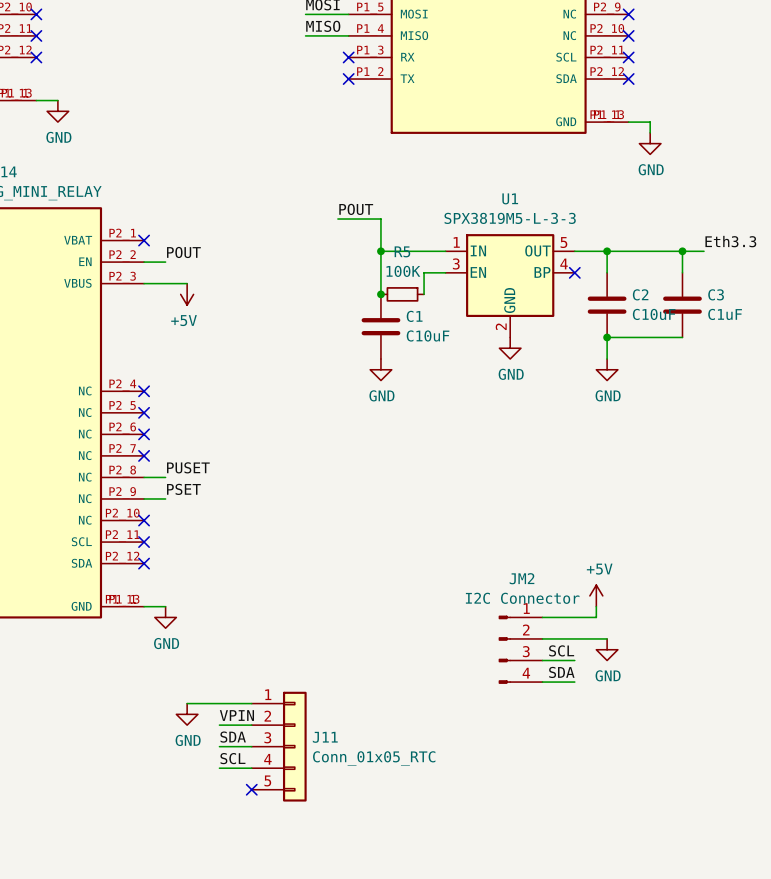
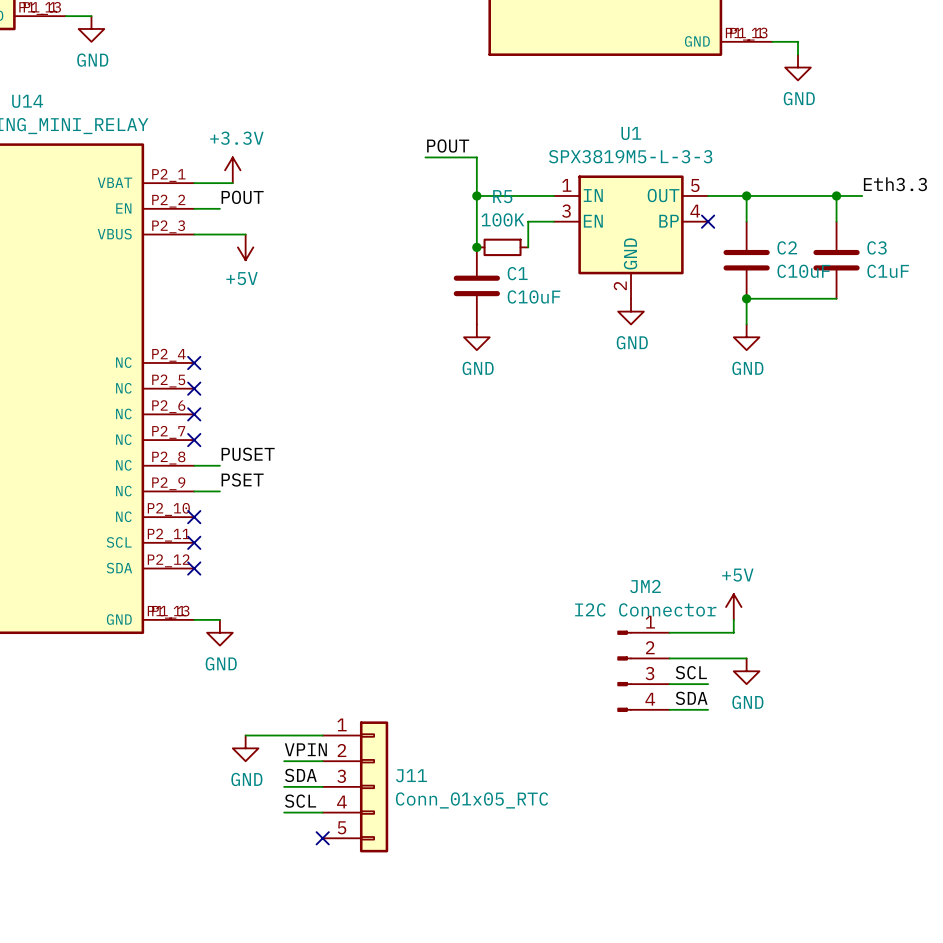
power symbol: none -> +3.3V (232, 170)
wire: none -> (194, 183) (232, 183)
no-connect mark: (144, 240) -> none

